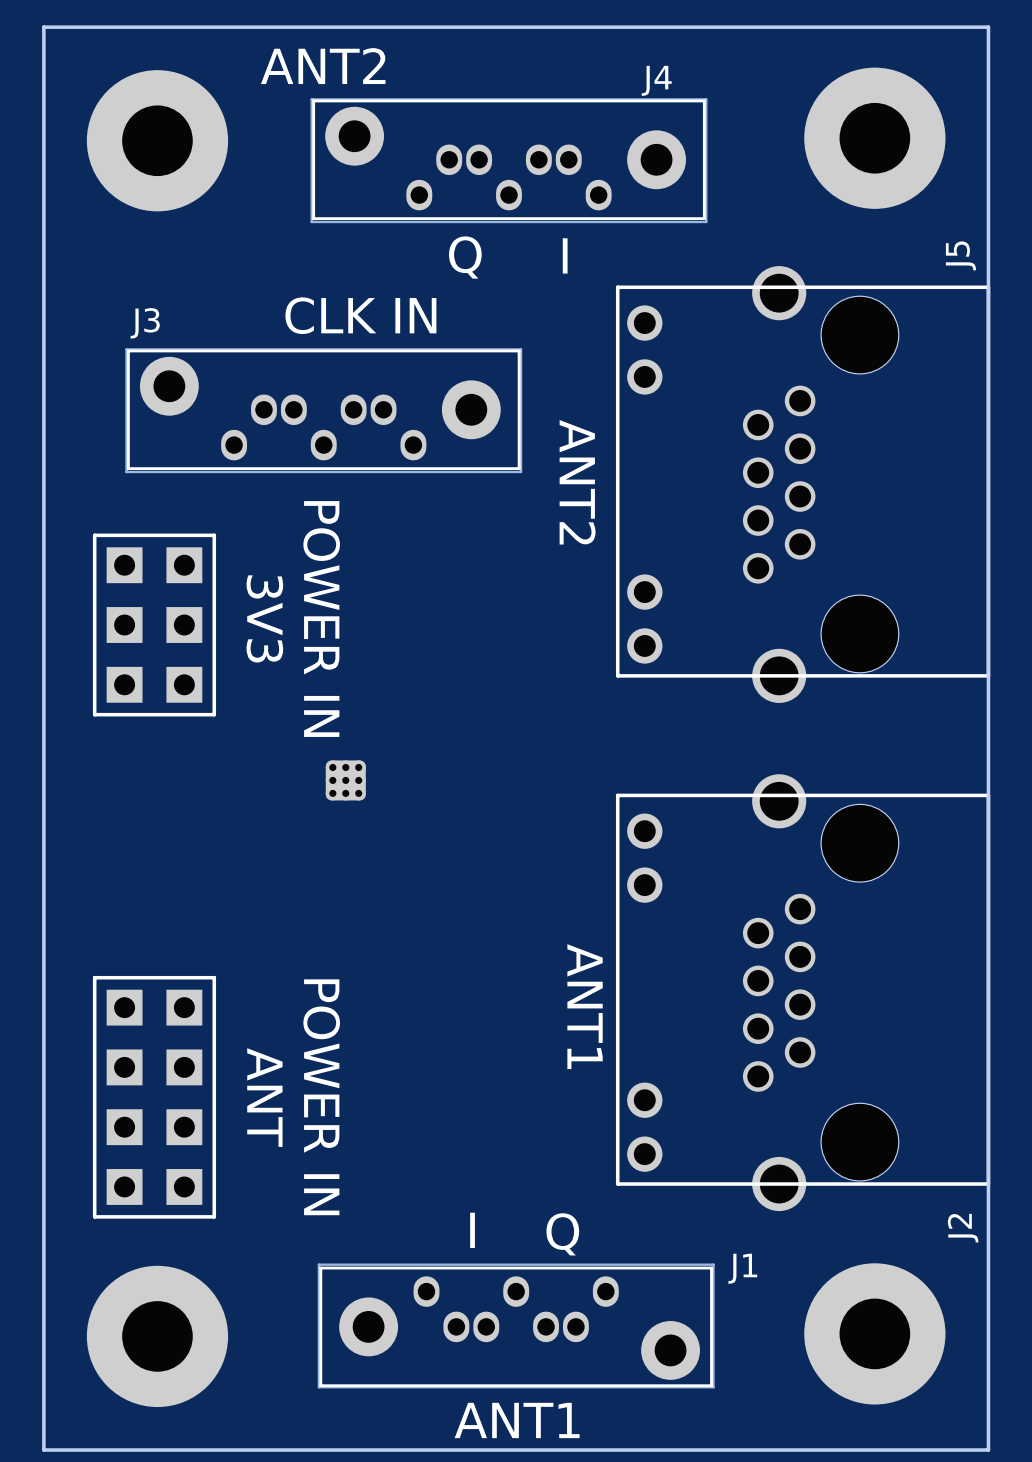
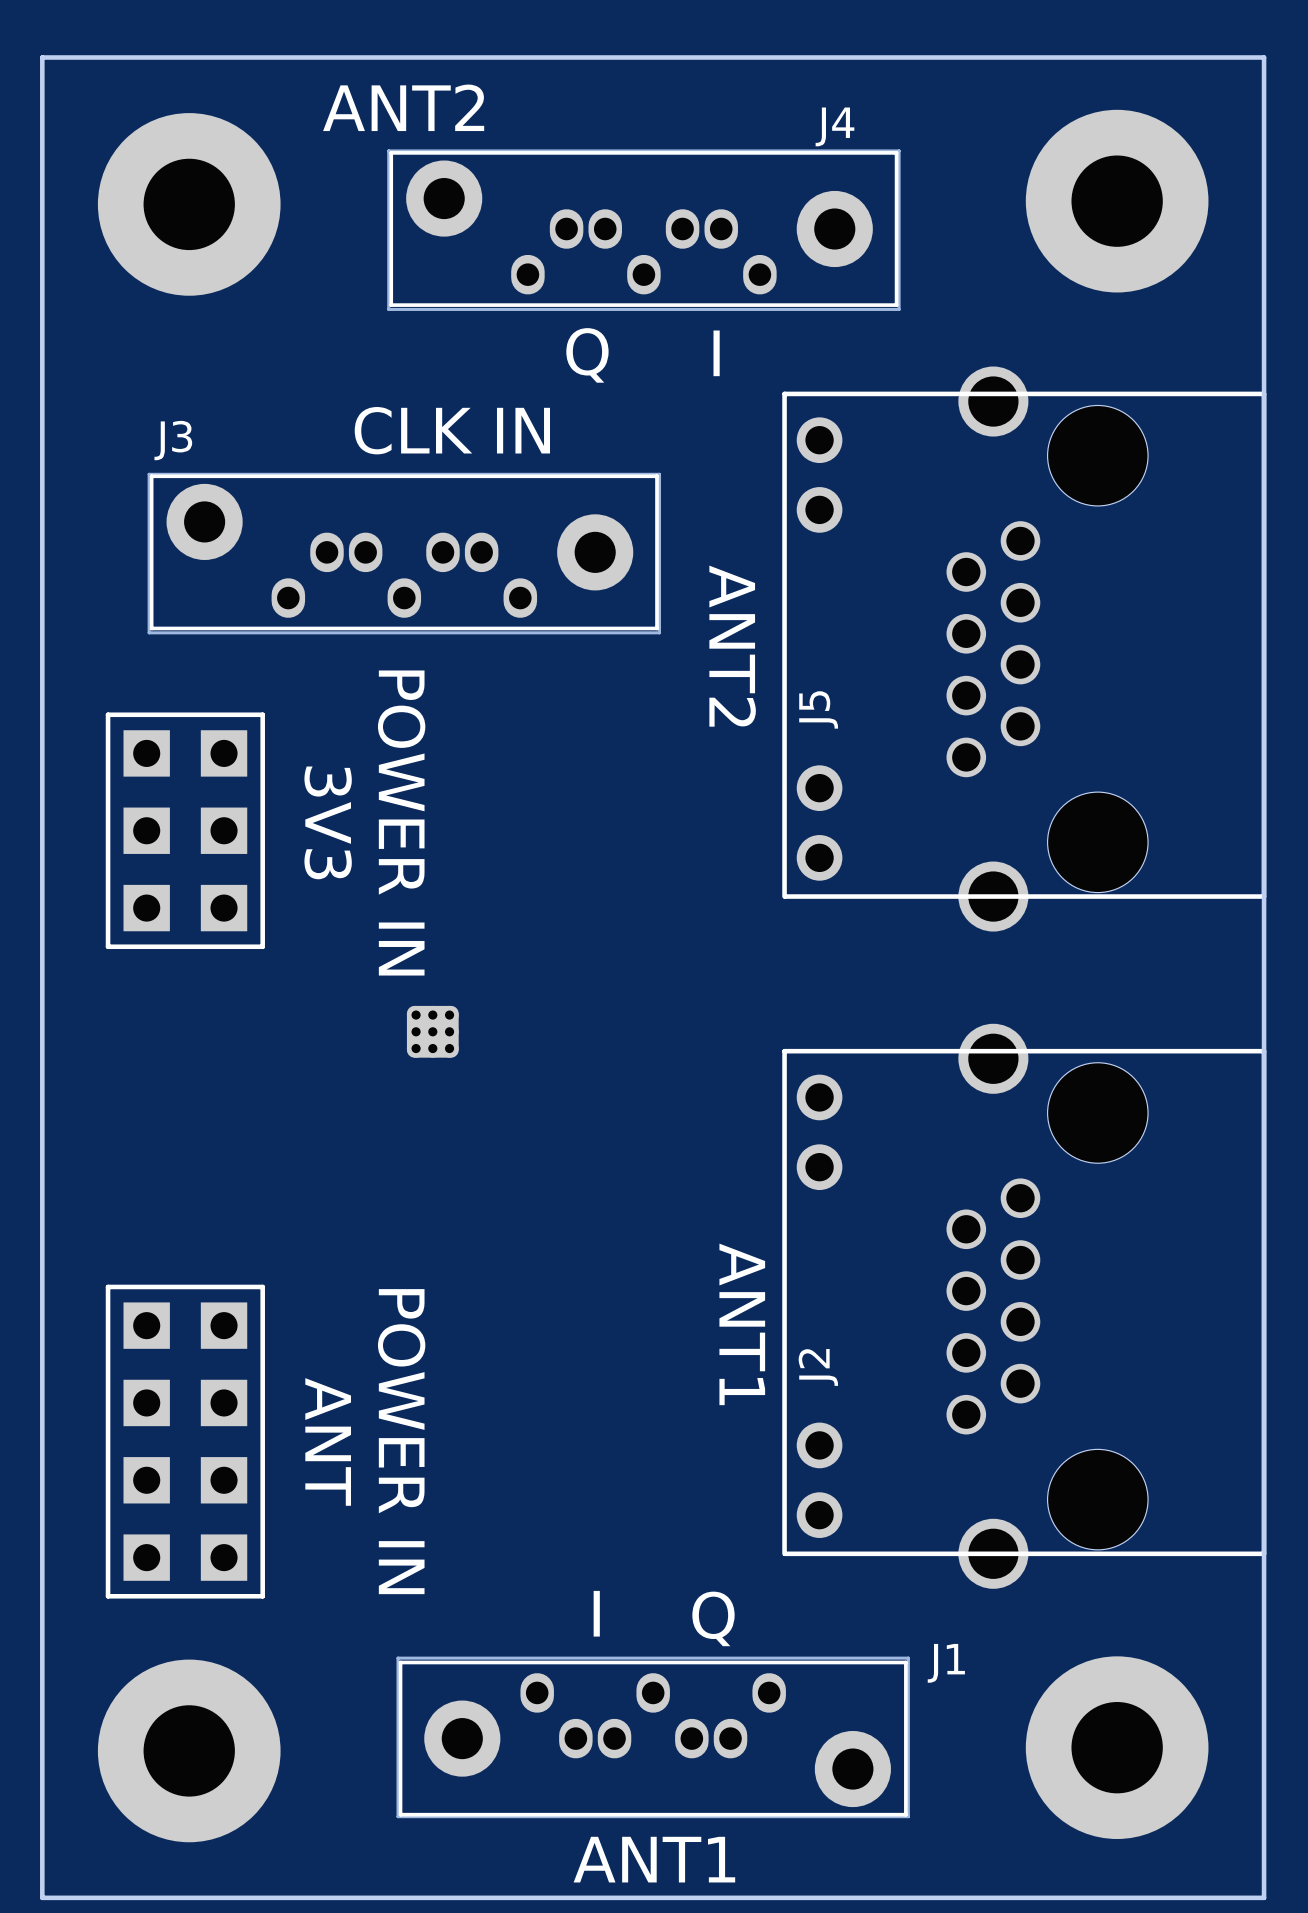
J5 name position: J5 (960, 255) -> J5 (818, 709)
J2 name position: J2 (963, 1228) -> J2 (818, 1367)

